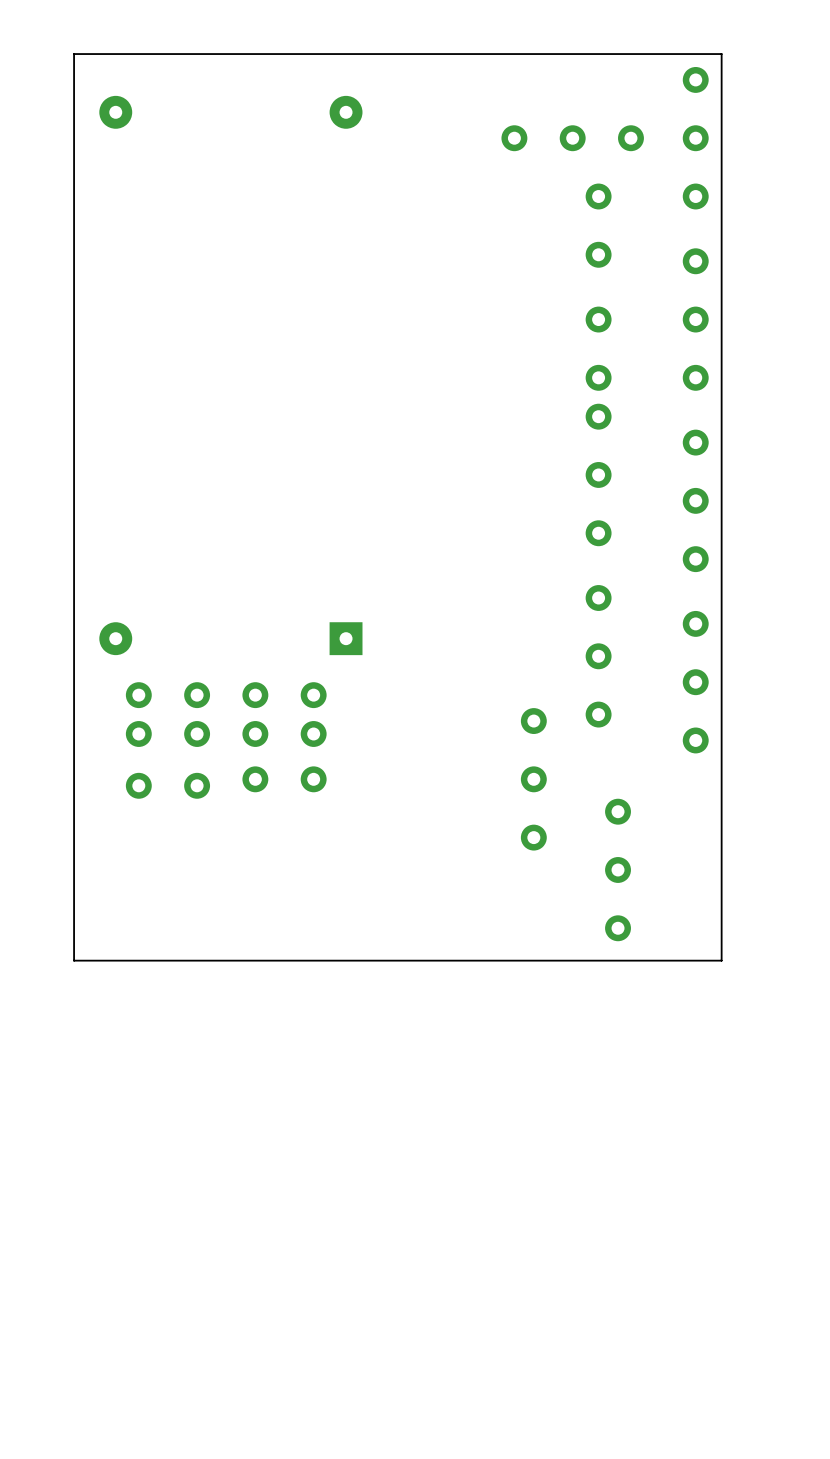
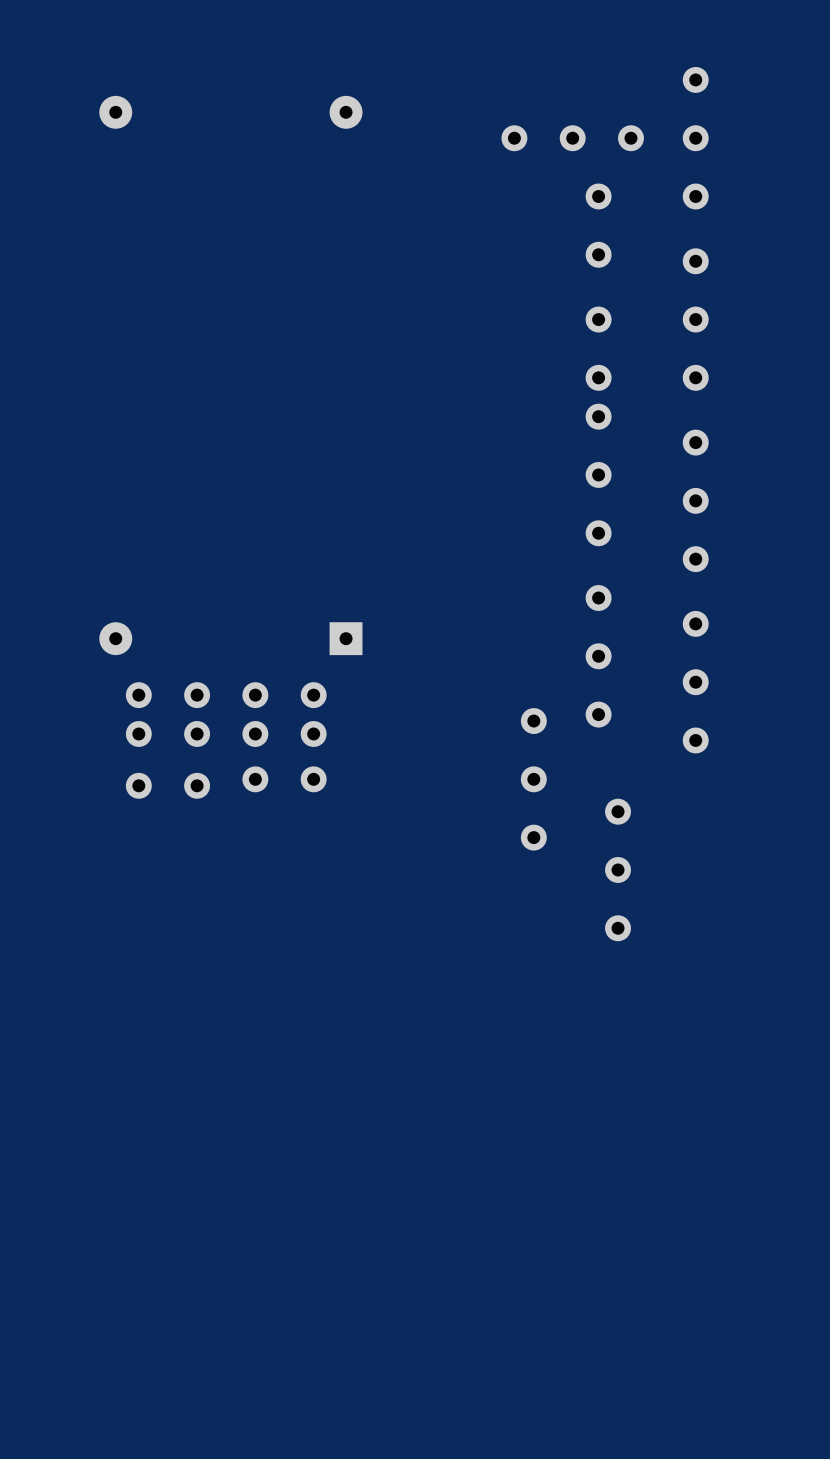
board edge: (721, 54) (74, 54) (74, 960) (721, 960) (721, 54) -> none

